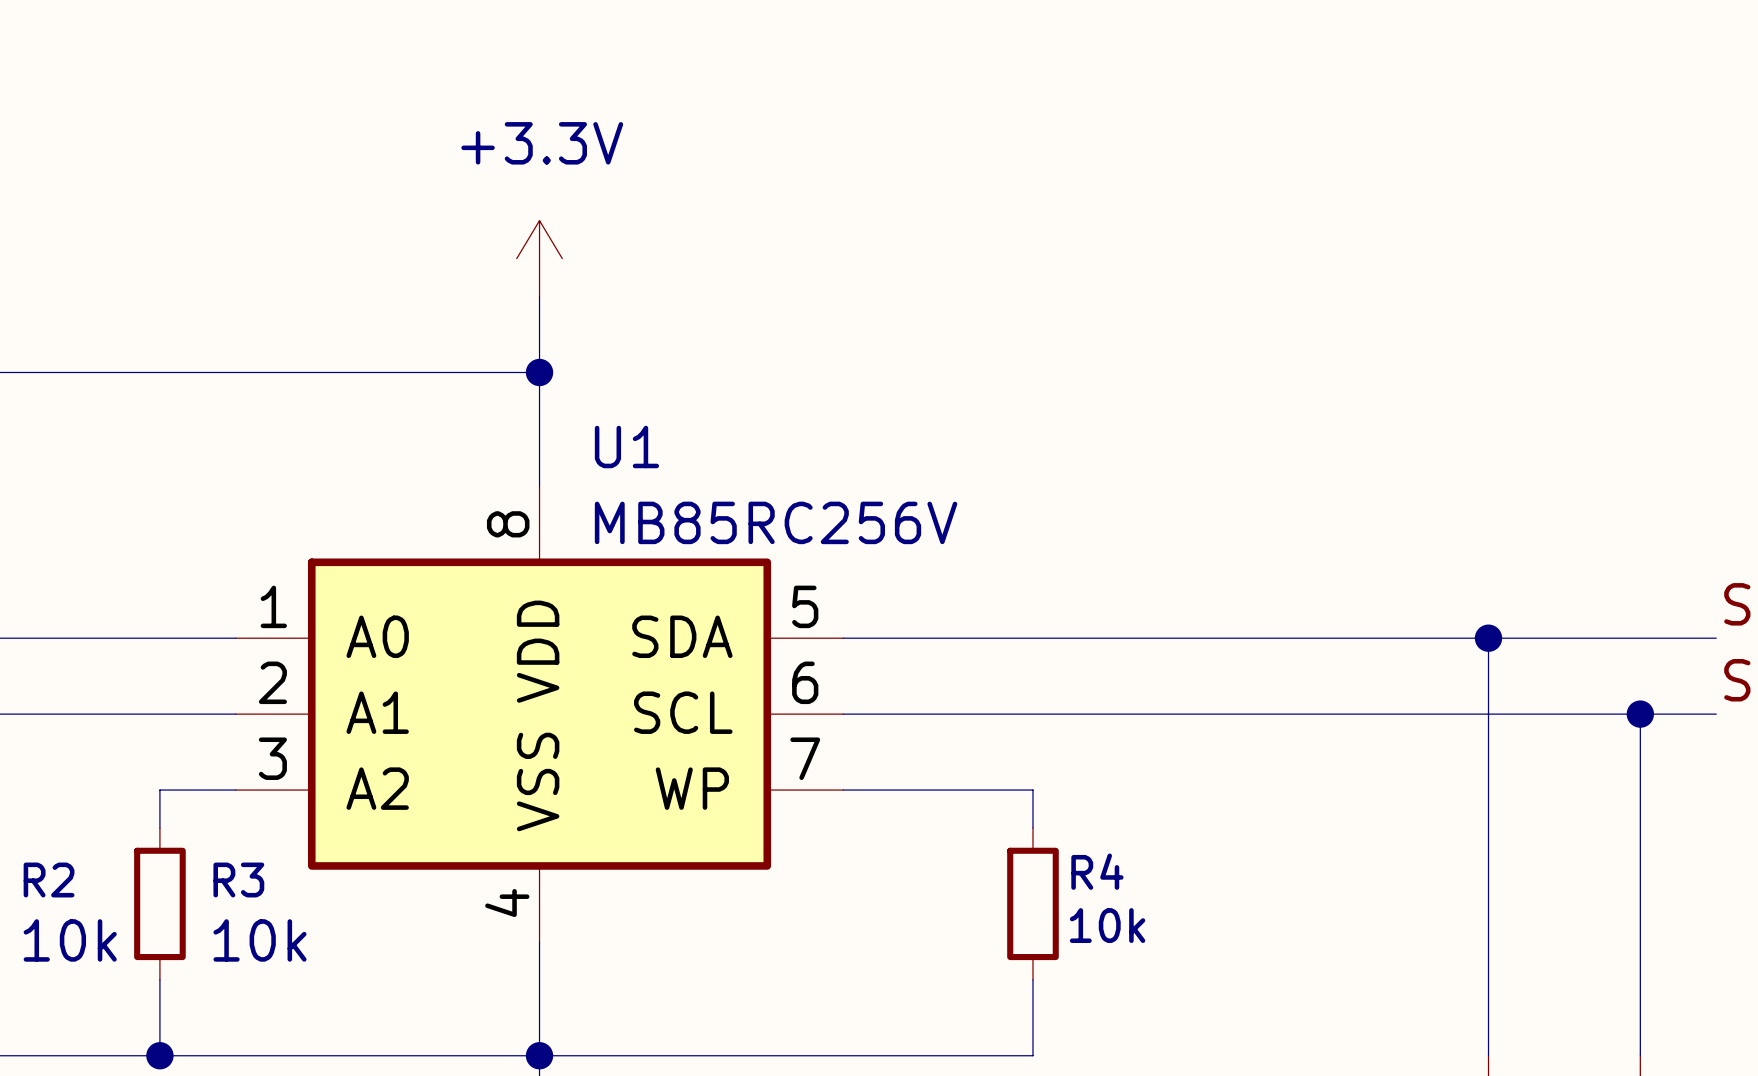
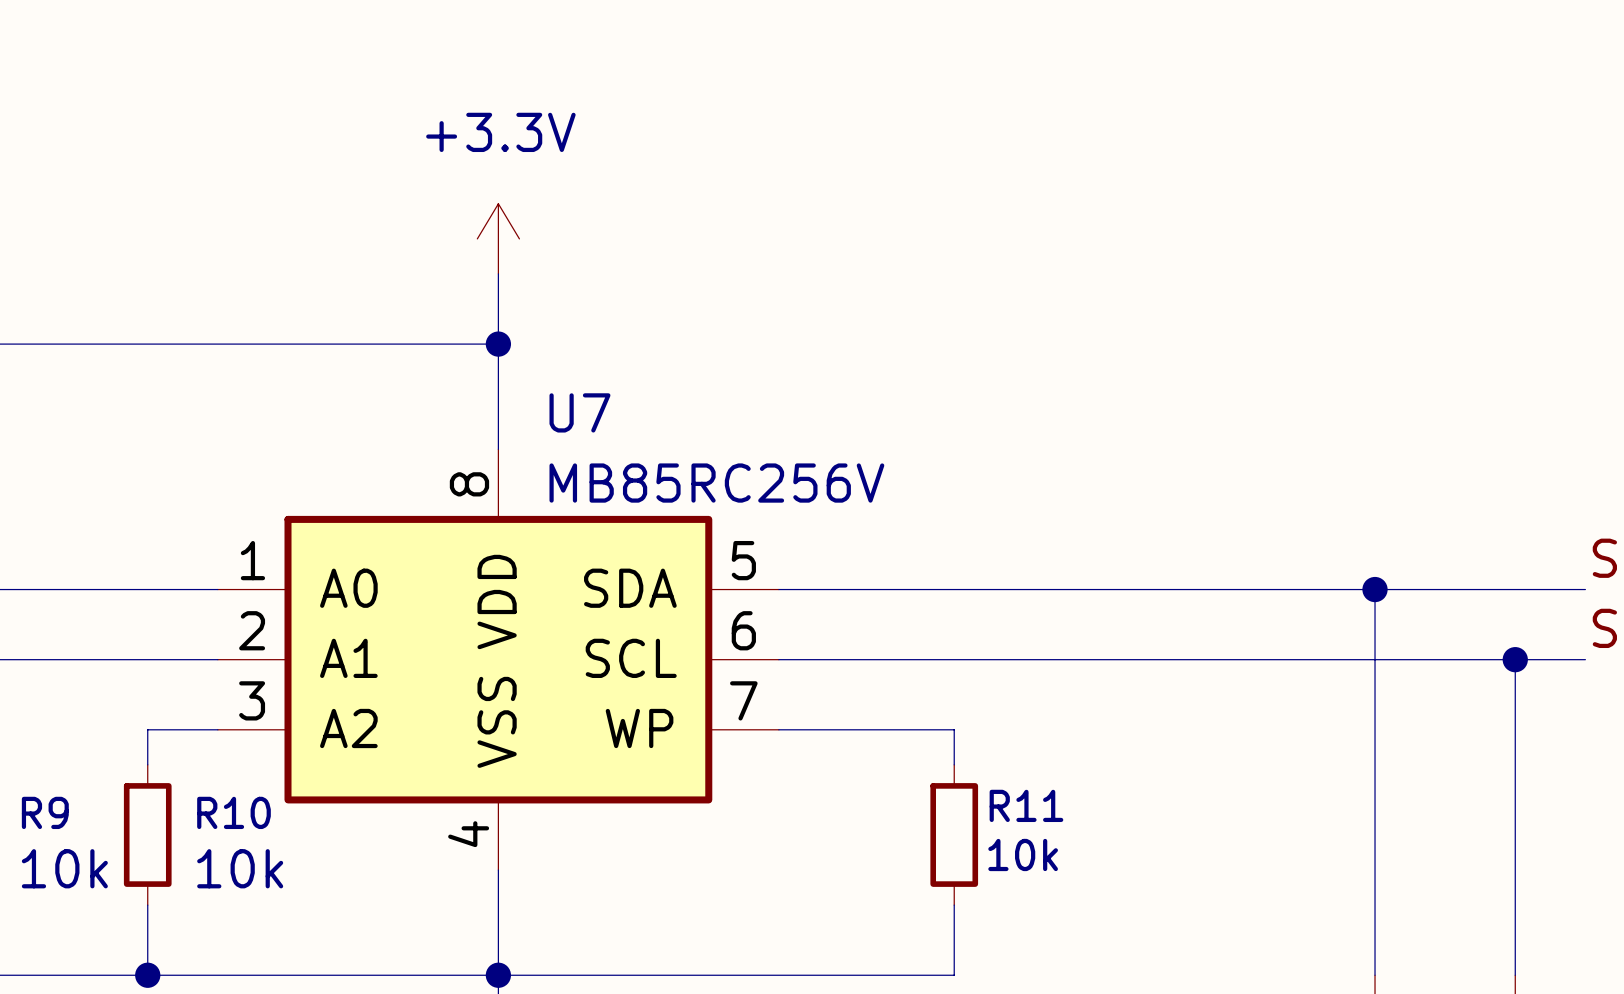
U1 name: U1 (626, 446) -> U7 (579, 412)
R4 name: R4 (1097, 871) -> R11 (1026, 805)
R2 name: R2 (49, 880) -> R9 (45, 812)
R3 name: R3 (238, 880) -> R10 (234, 812)

